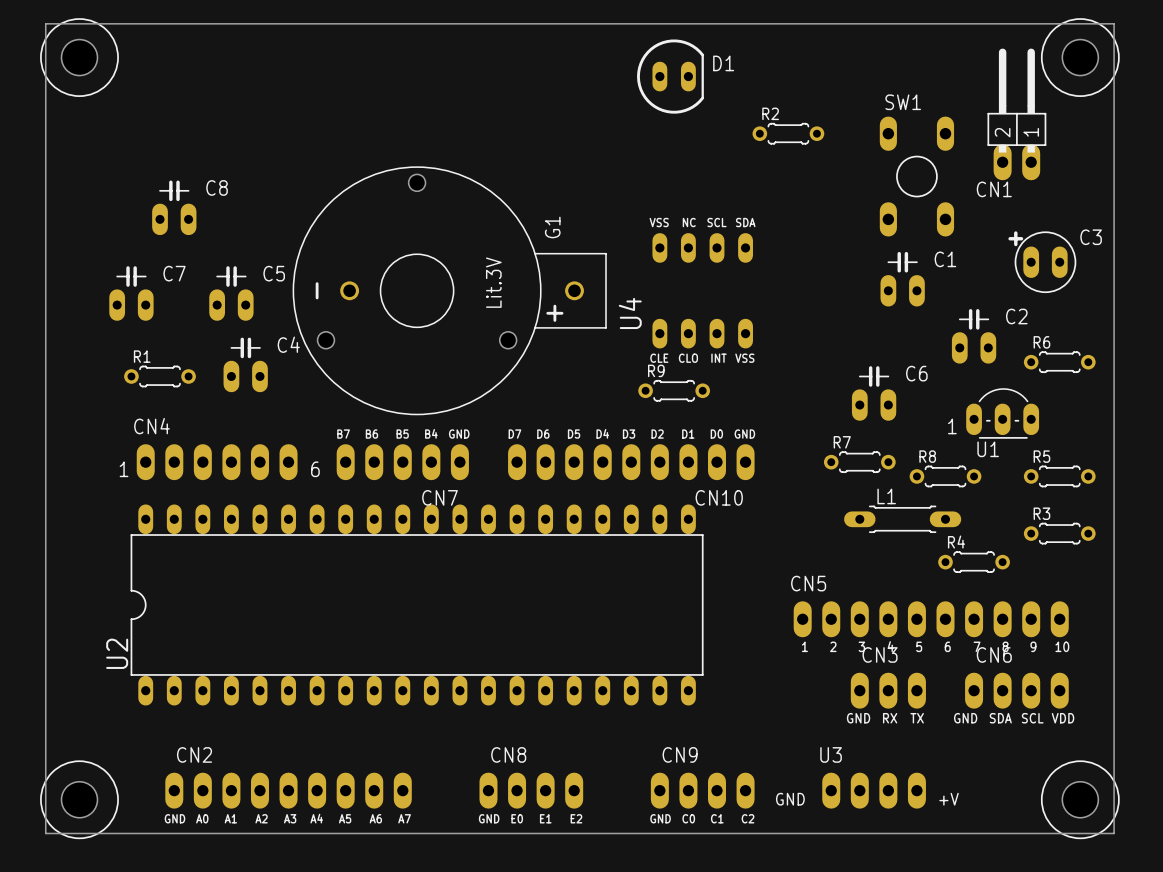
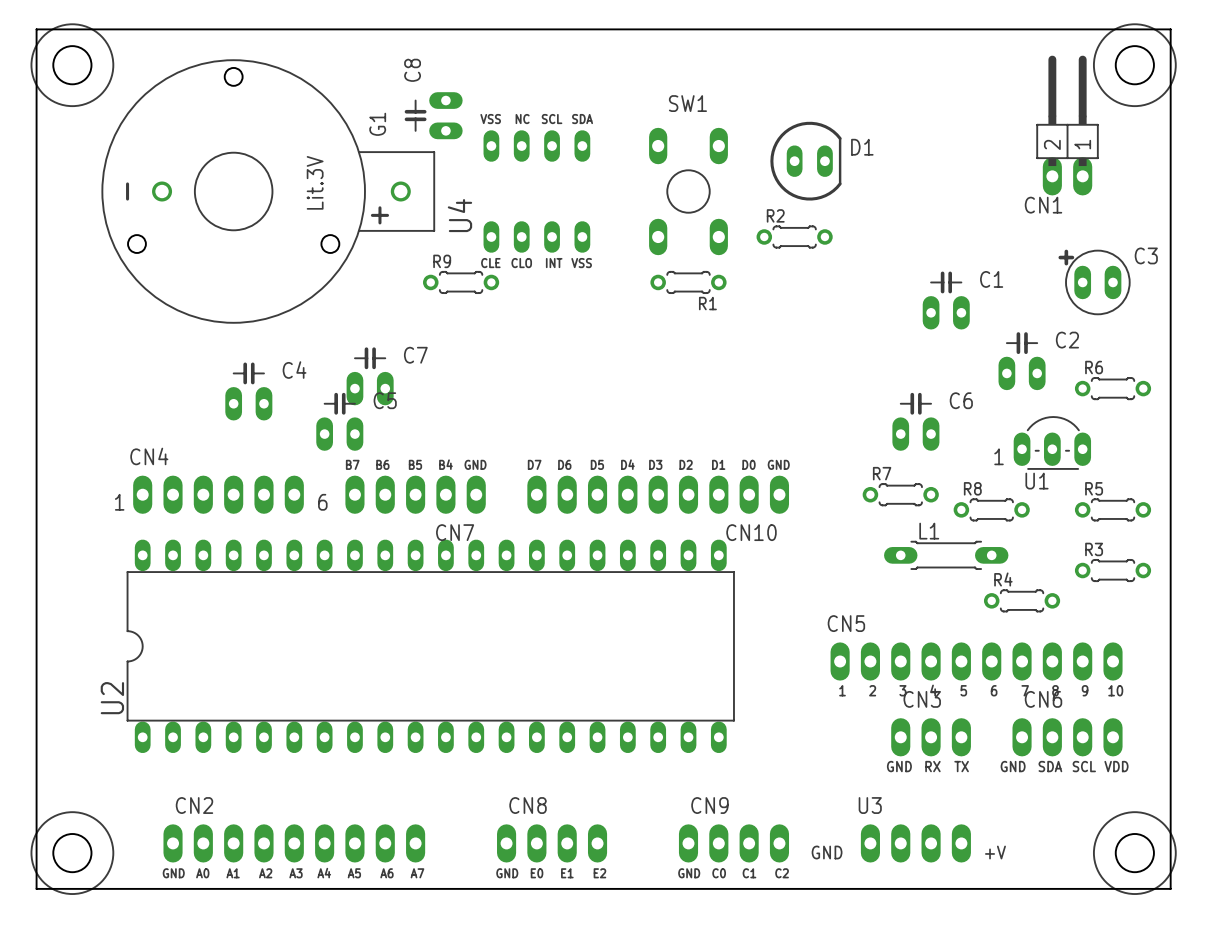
D1 position: (670, 76) -> (806, 161)
SW1 name position: SW1 (903, 102) -> SW1 (687, 103)
R2 position: (788, 133) -> (794, 236)
SW1 position: (916, 176) -> (688, 191)
C8 rotation: 0° (174, 207) -> 90° counterclockwise (433, 115)
C8 position: (174, 207) -> (433, 115)
G1 position: (449, 290) -> (268, 191)
U4 position: (702, 290) -> (536, 191)
C7 position: (131, 293) -> (370, 376)
C5 position: (231, 293) -> (339, 421)
R1 name position: R1 (142, 356) -> R1 (707, 303)
R1 position: (160, 376) -> (688, 282)
R9 position: (674, 390) -> (461, 282)

